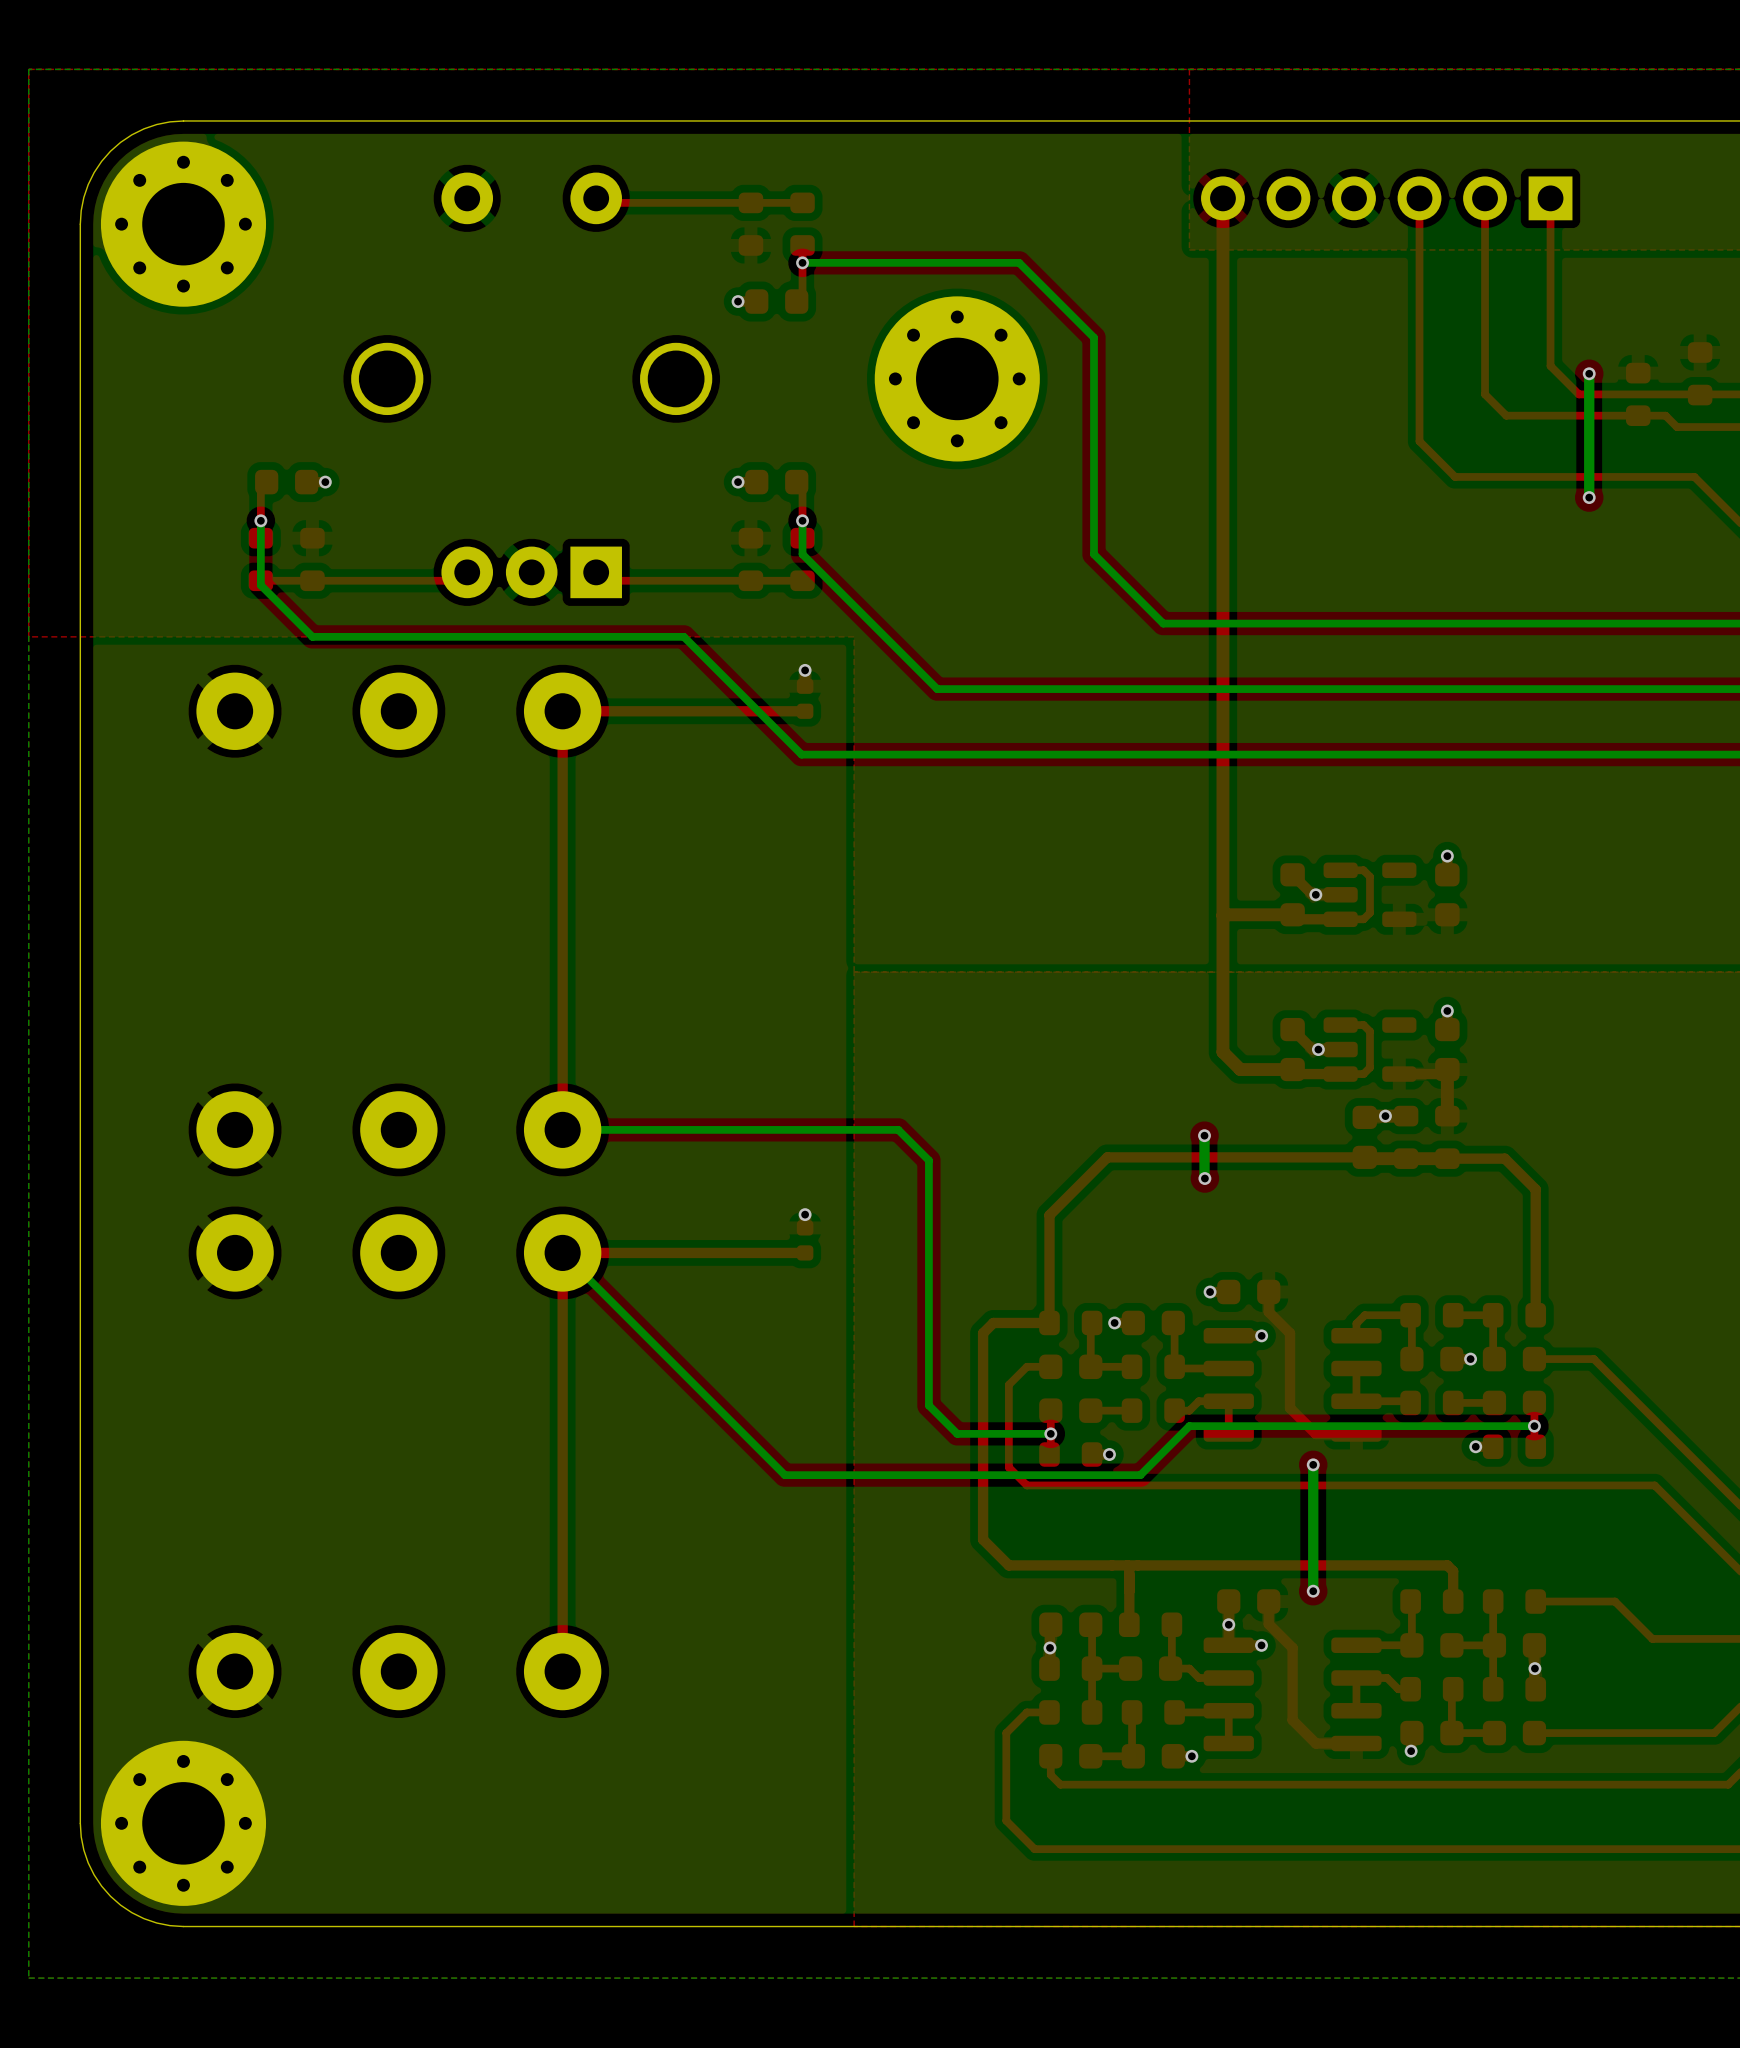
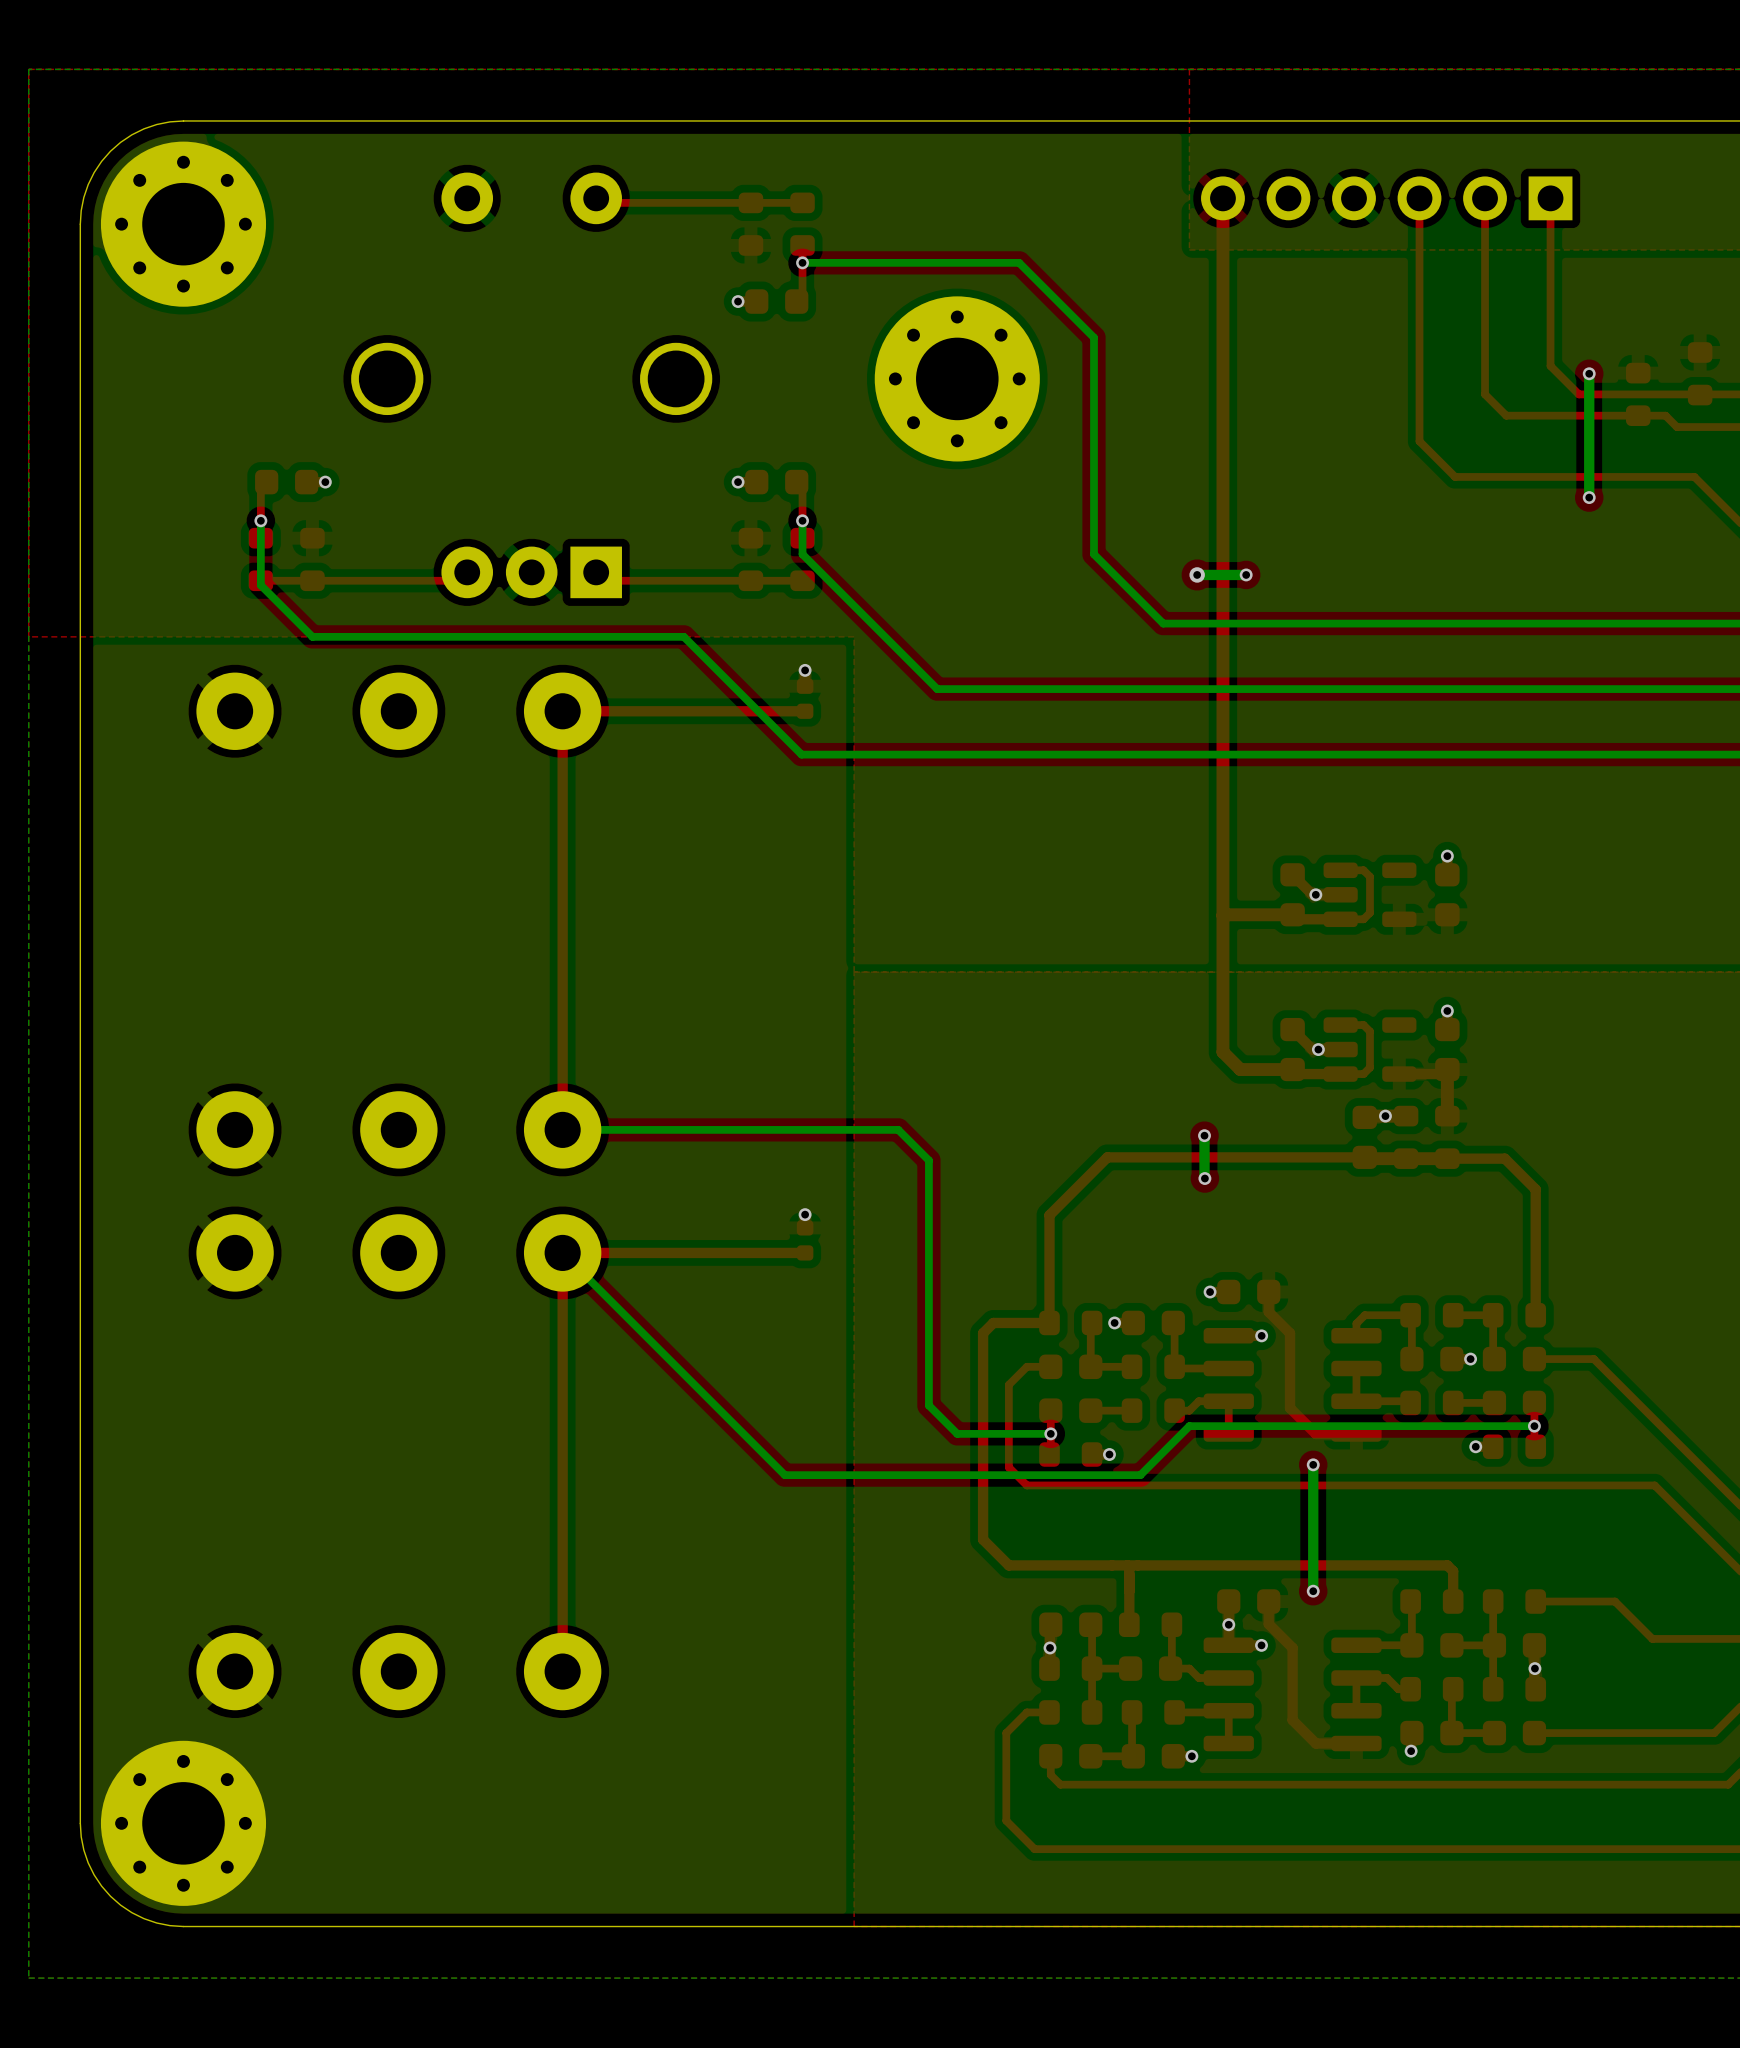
via: none -> (1197, 574)
bottom track: none -> (1246, 574) (1197, 574)
via: none -> (1246, 574)

